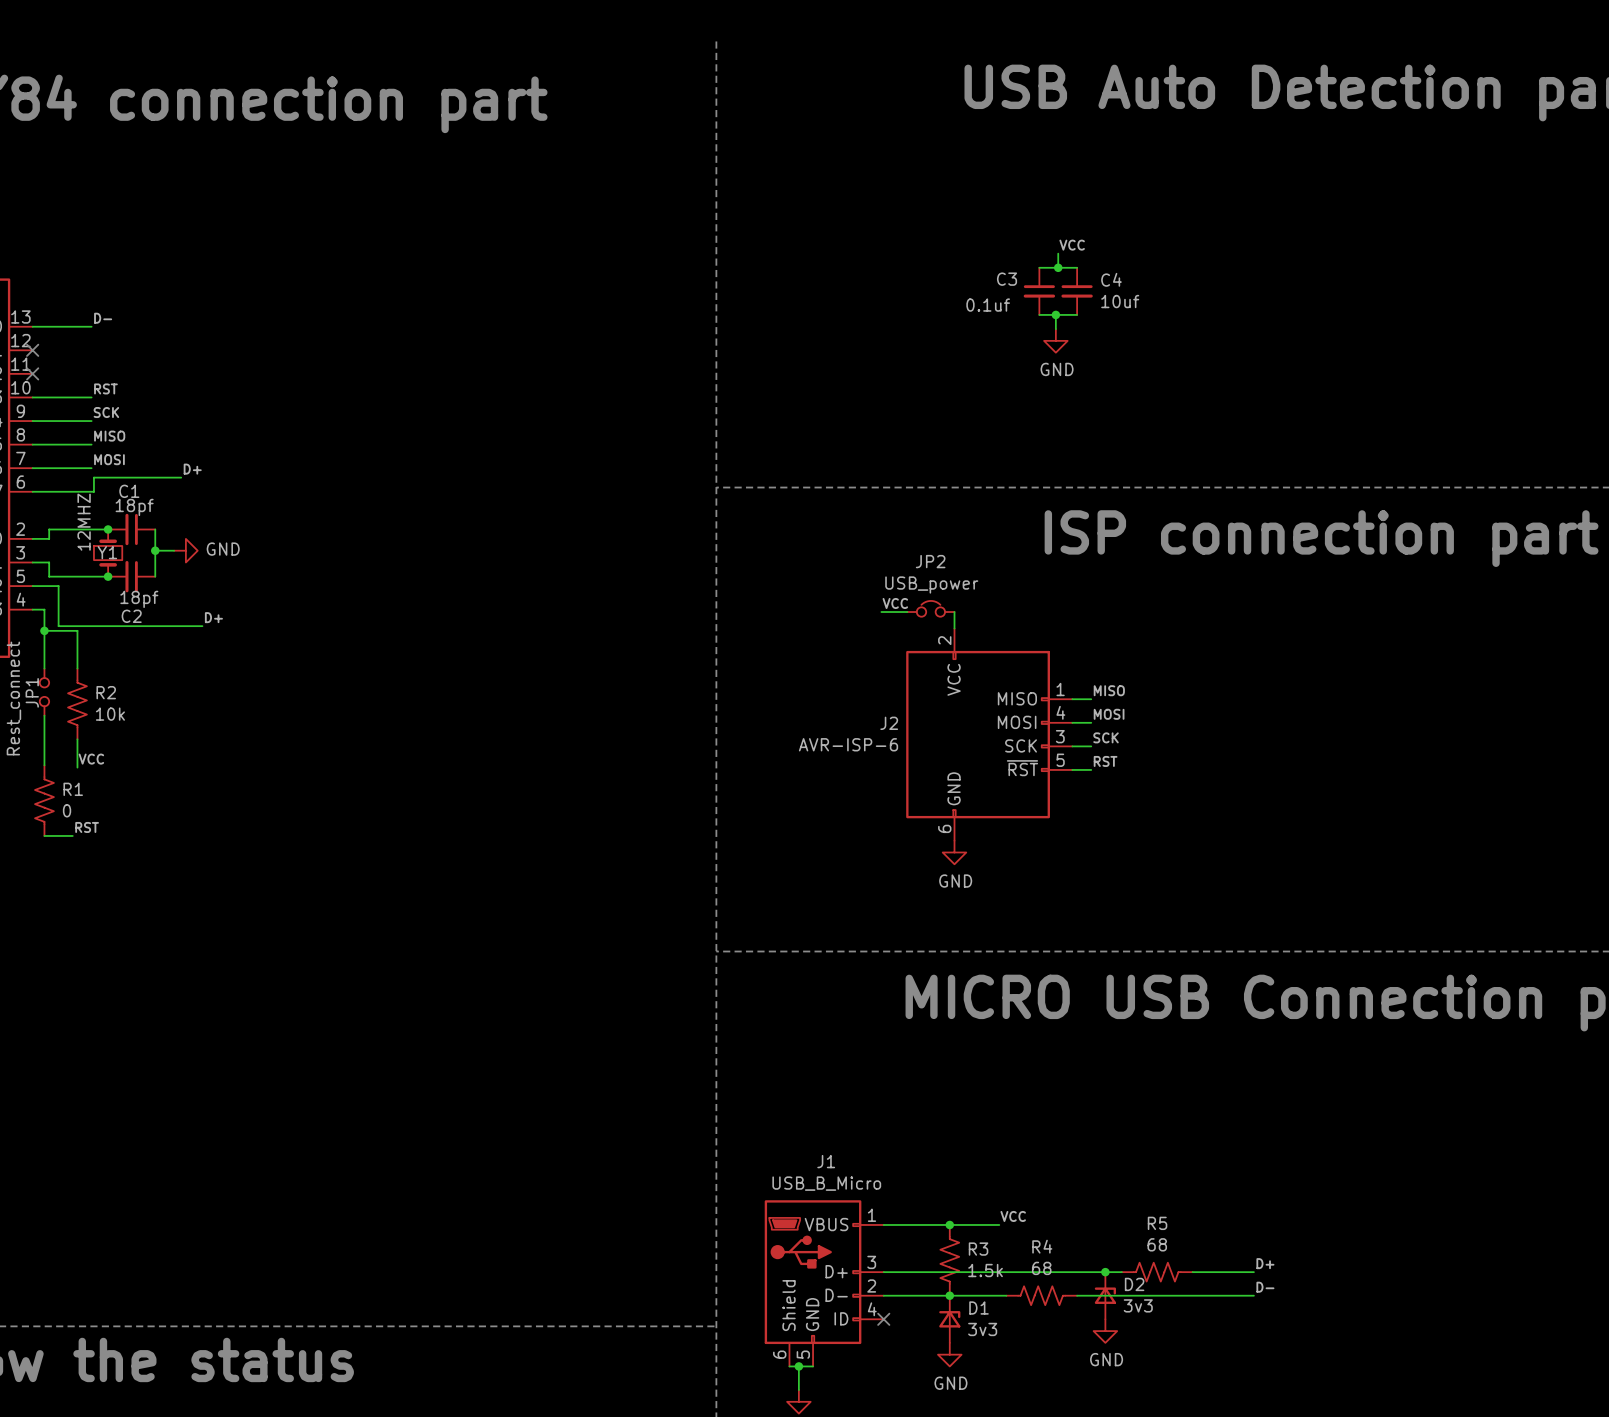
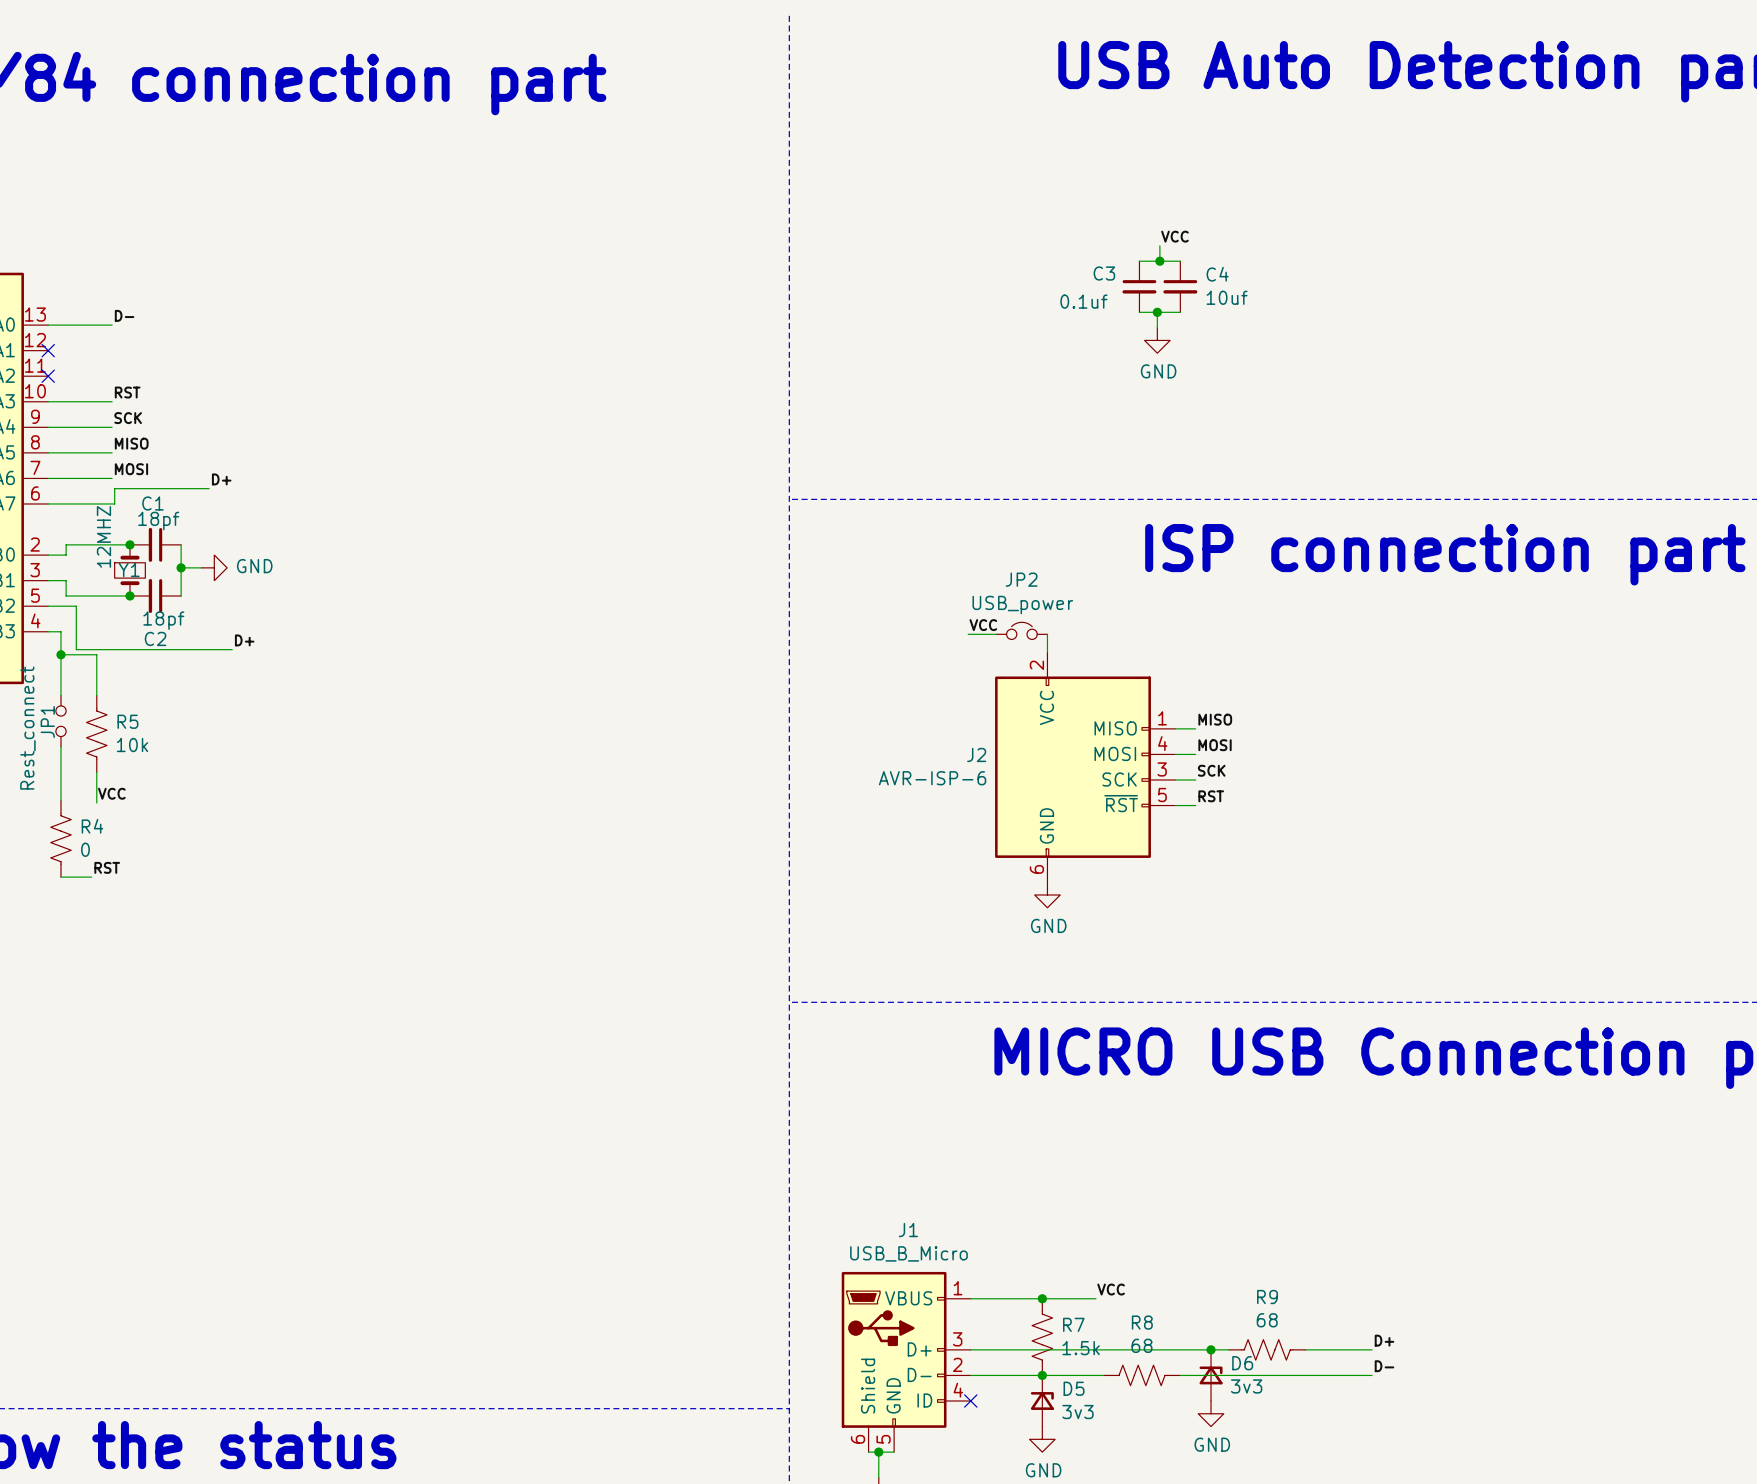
R2 name: R2 (106, 692) -> R5 (127, 721)
R1 name: R1 (73, 789) -> R4 (92, 826)
R5 name: R5 (1157, 1223) -> R9 (1267, 1297)
R4 name: R4 (1042, 1246) -> R8 (1142, 1322)
R3 name: R3 (978, 1249) -> R7 (1073, 1324)
D2 name: D2 (1134, 1284) -> D6 (1242, 1363)
D1 name: D1 (979, 1308) -> D5 (1074, 1388)

